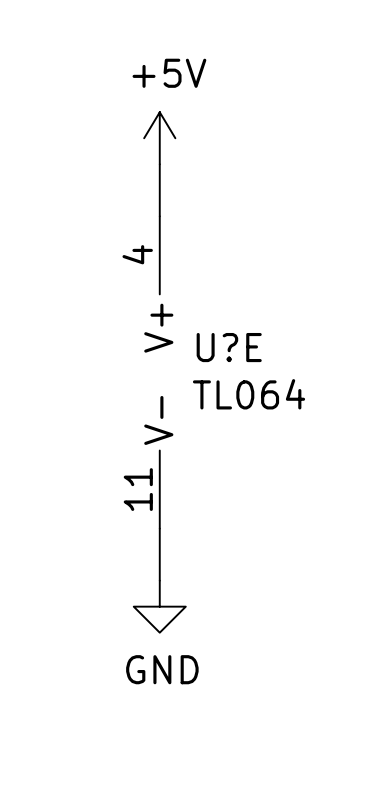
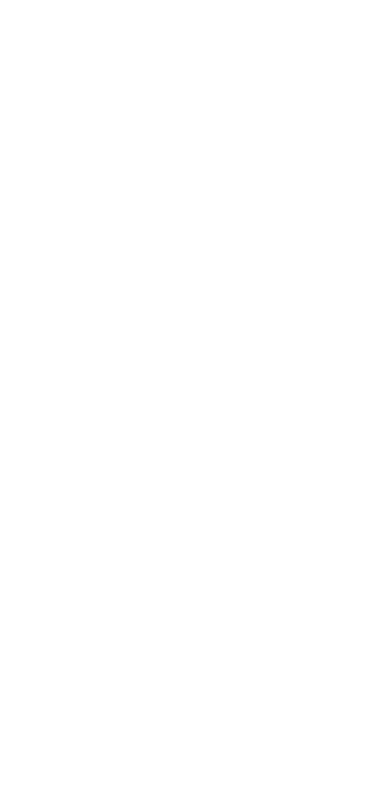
power symbol: +5V (159, 138) -> none
wire: (159, 164) (159, 216) -> none
U?E: TL064 (159, 372) -> none
wire: (159, 528) (159, 580) -> none
power symbol: GND (159, 606) -> none

